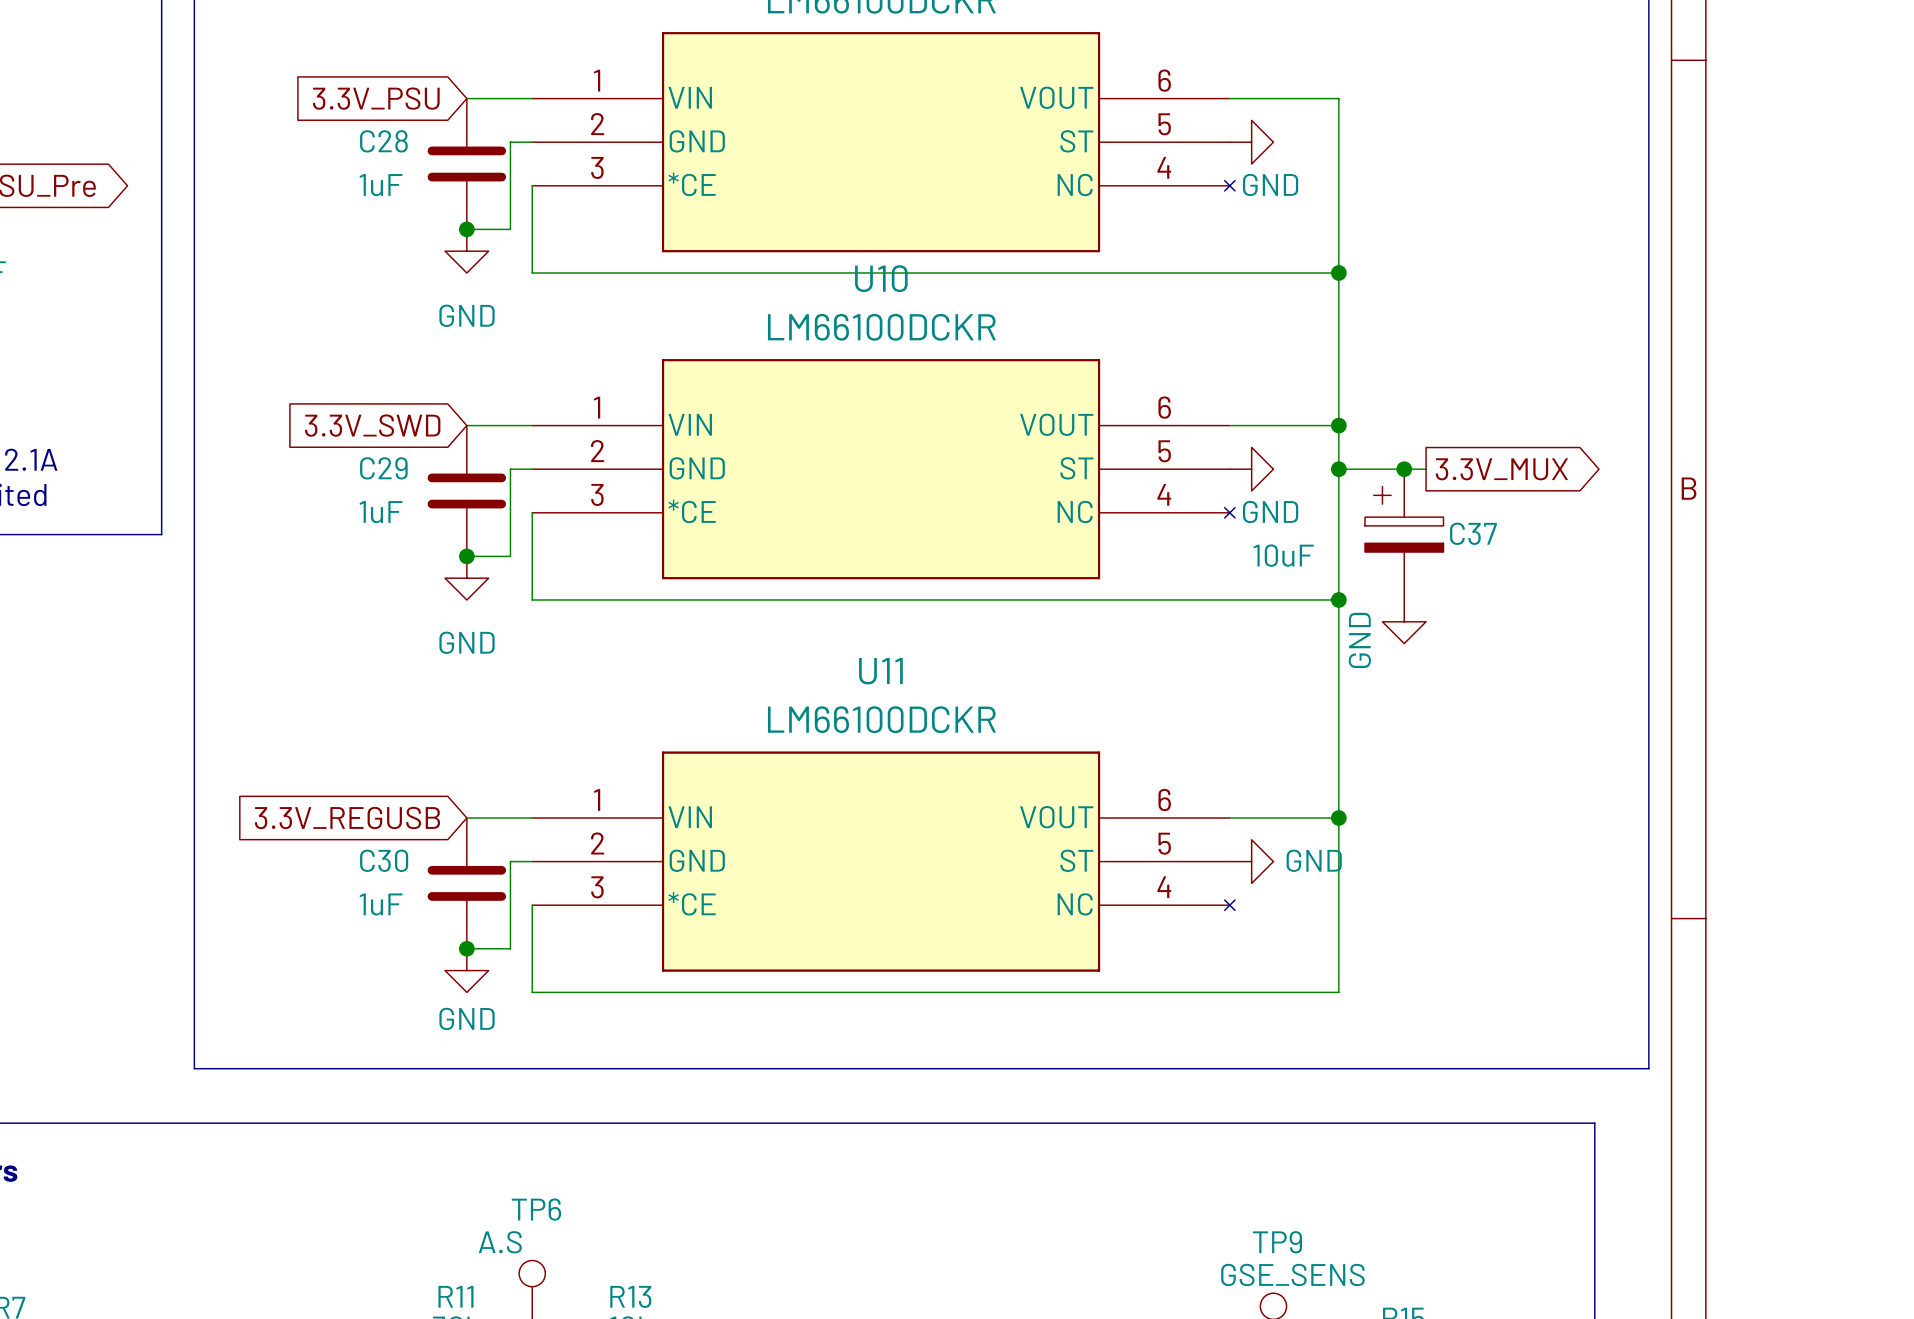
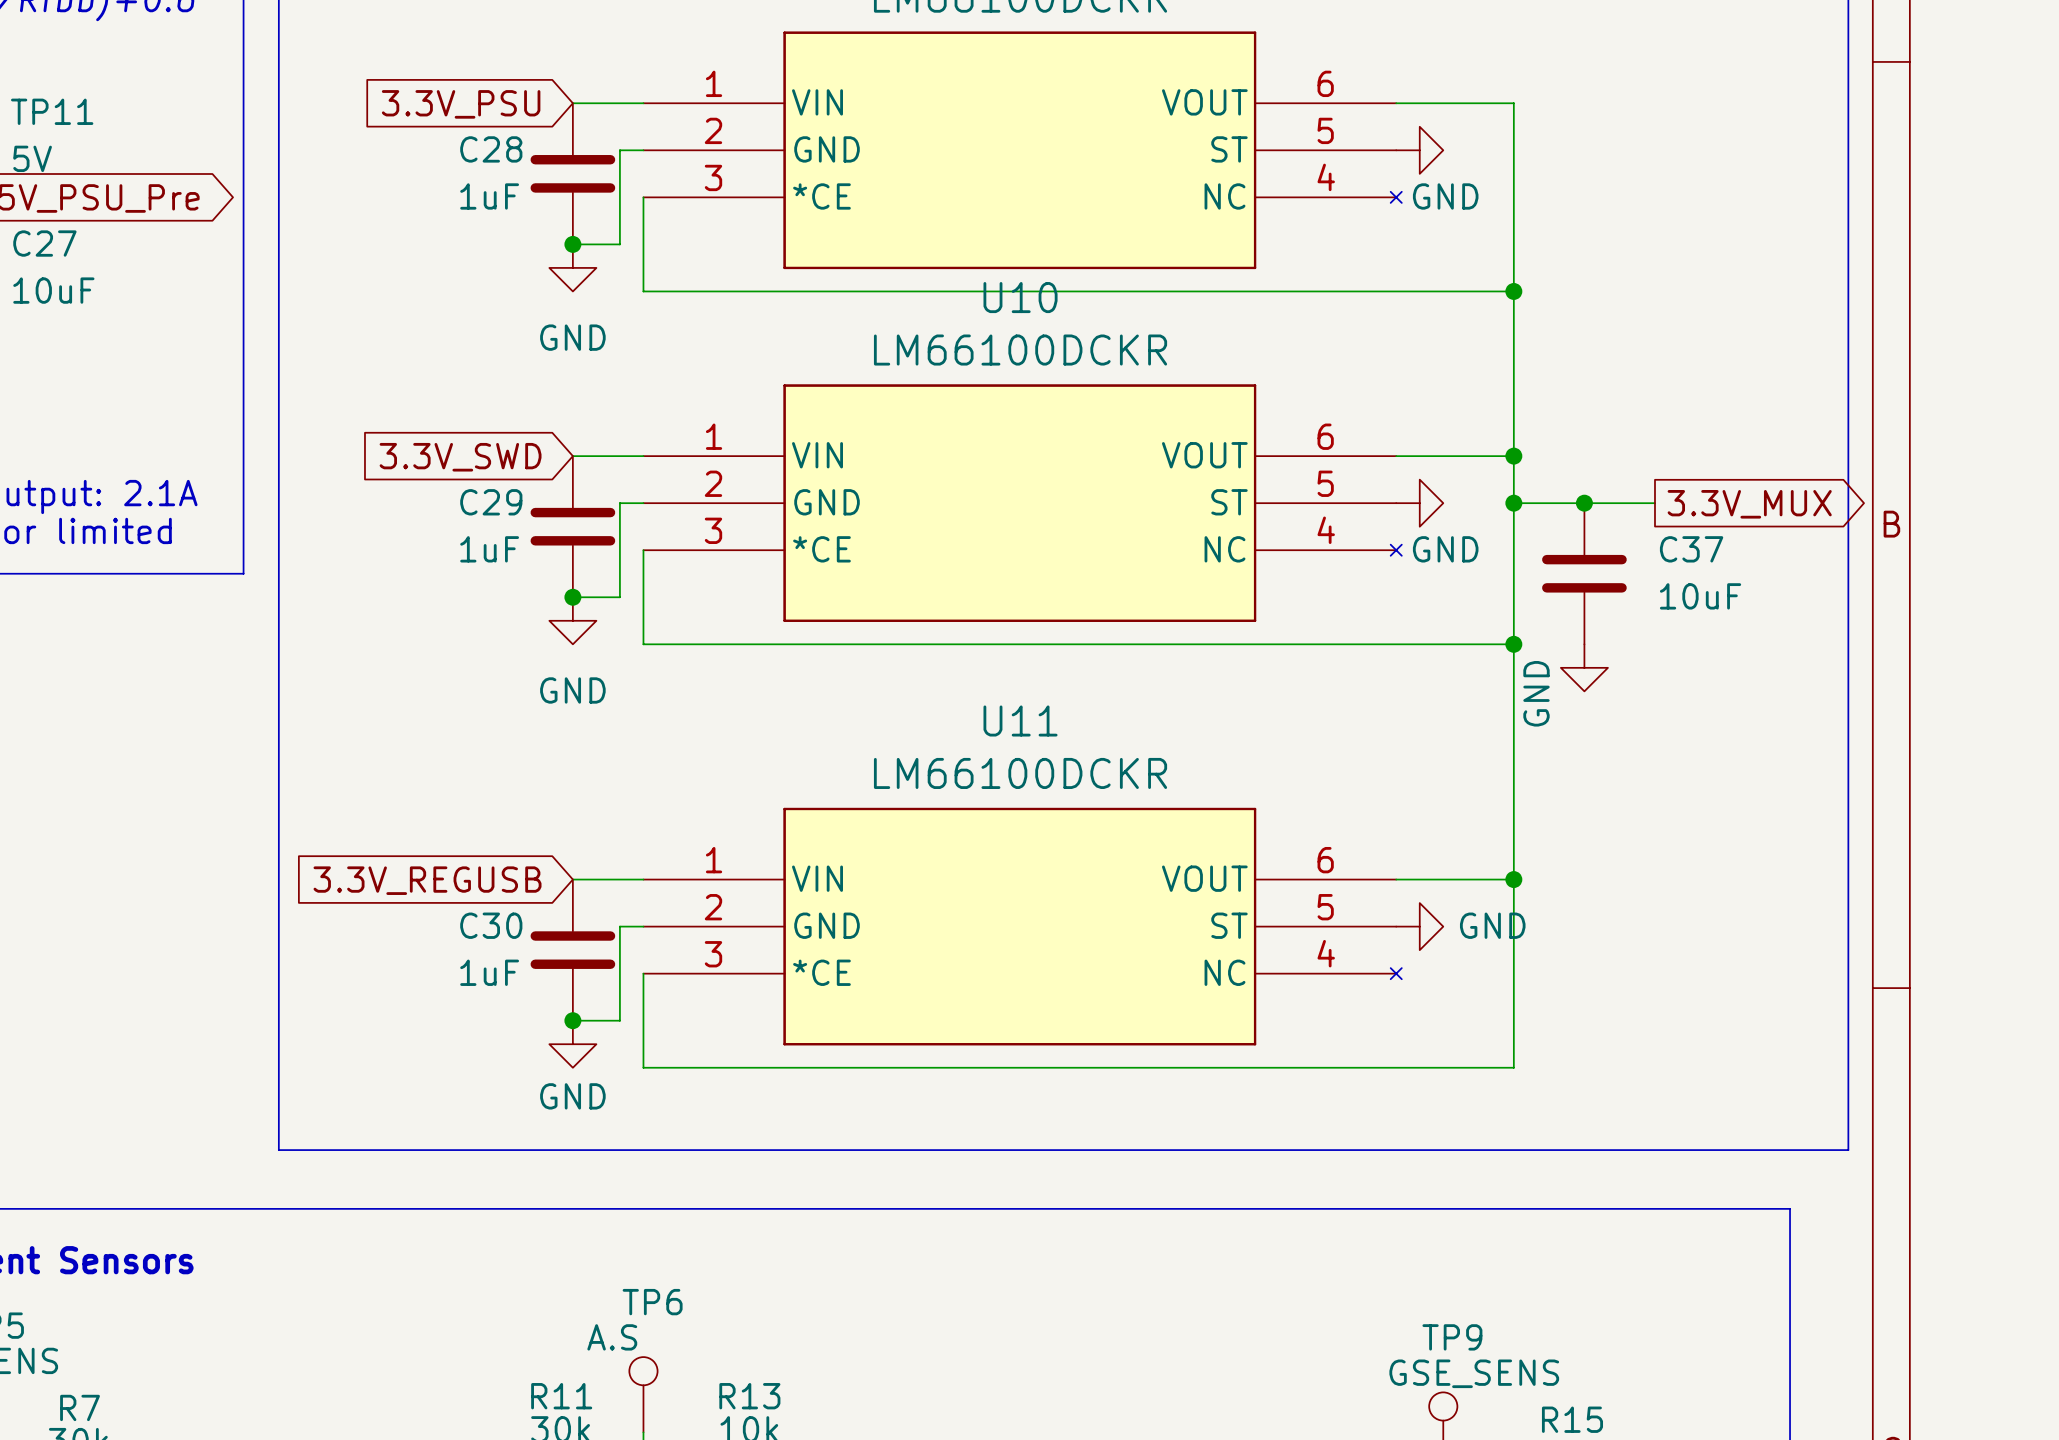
C37 symbol: [1365, 469, 1444, 600] -> [1542, 503, 1627, 645]
wire: none -> (1607, 503) (1654, 503)
global label position: 3.3V_MUX (1501, 469) -> 3.3V_MUX (1749, 504)
C37 value position: 10uF (1283, 555) -> 10uF (1700, 596)

